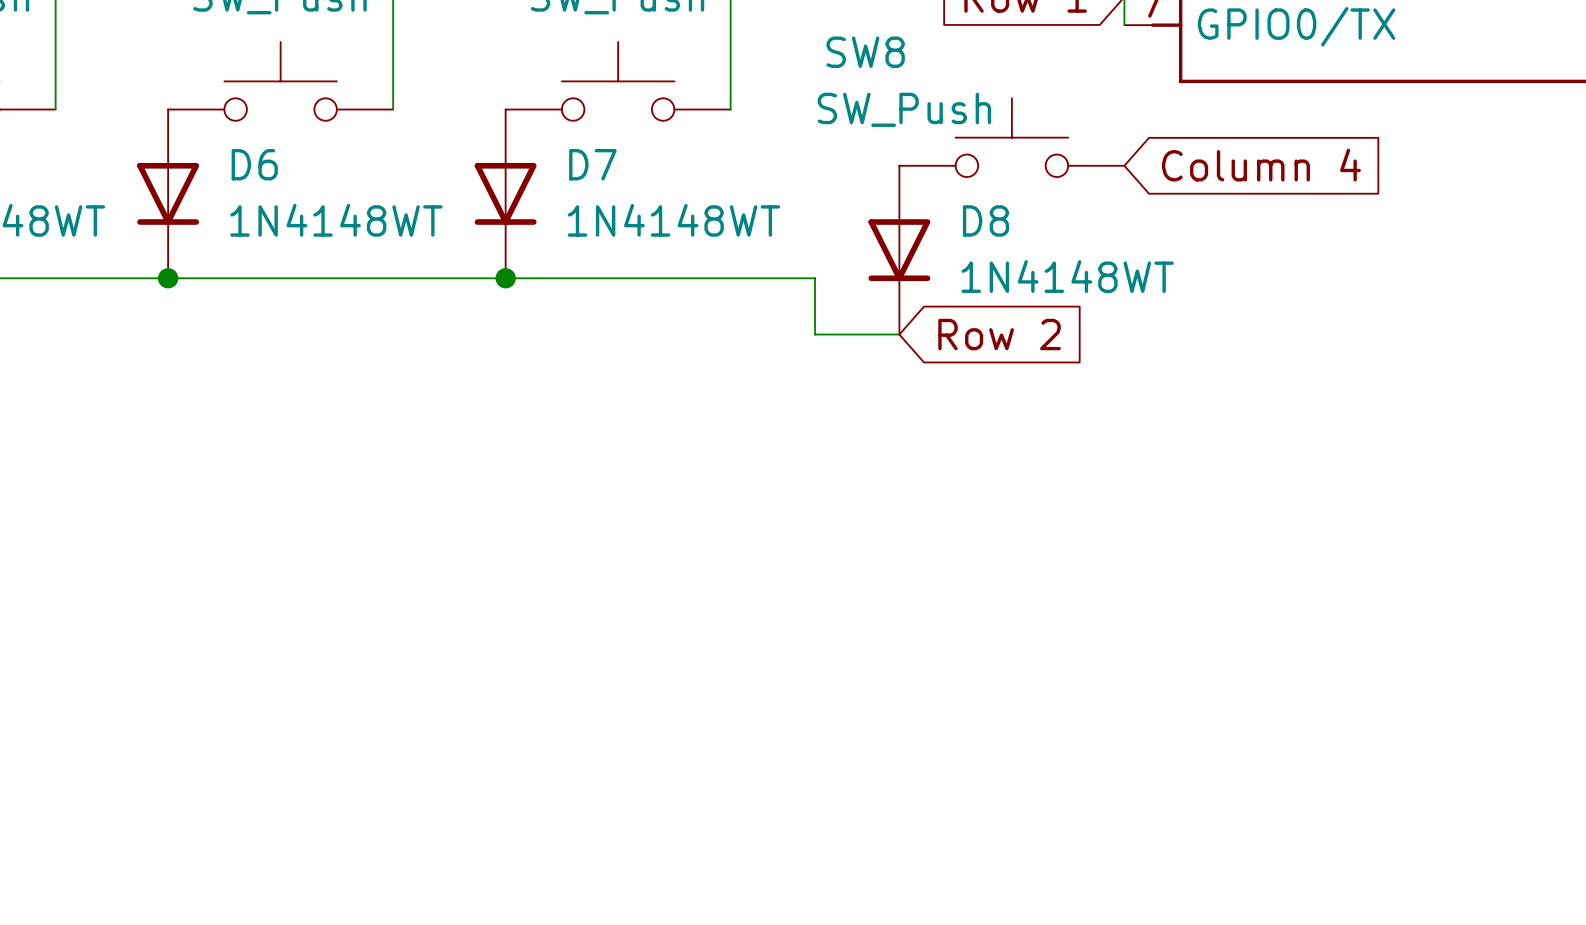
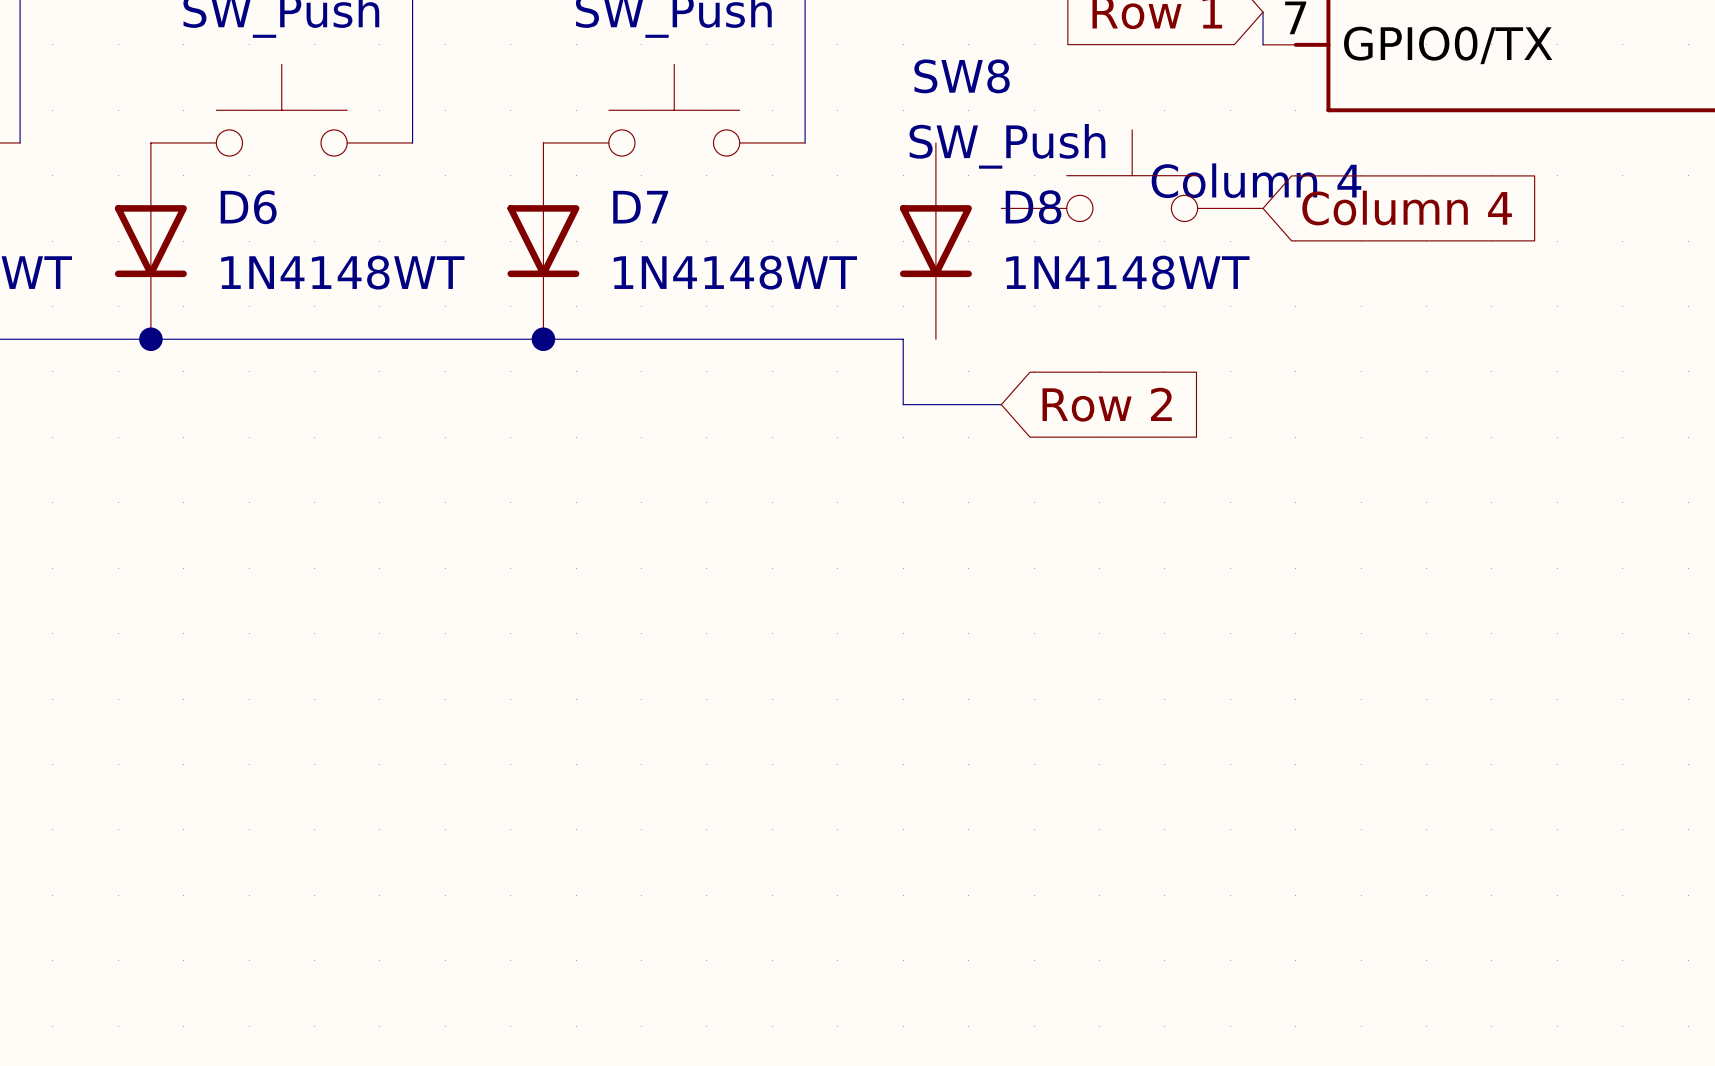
text: none -> Column 4 (1256, 180)
D8 position: (899, 250) -> (935, 241)

